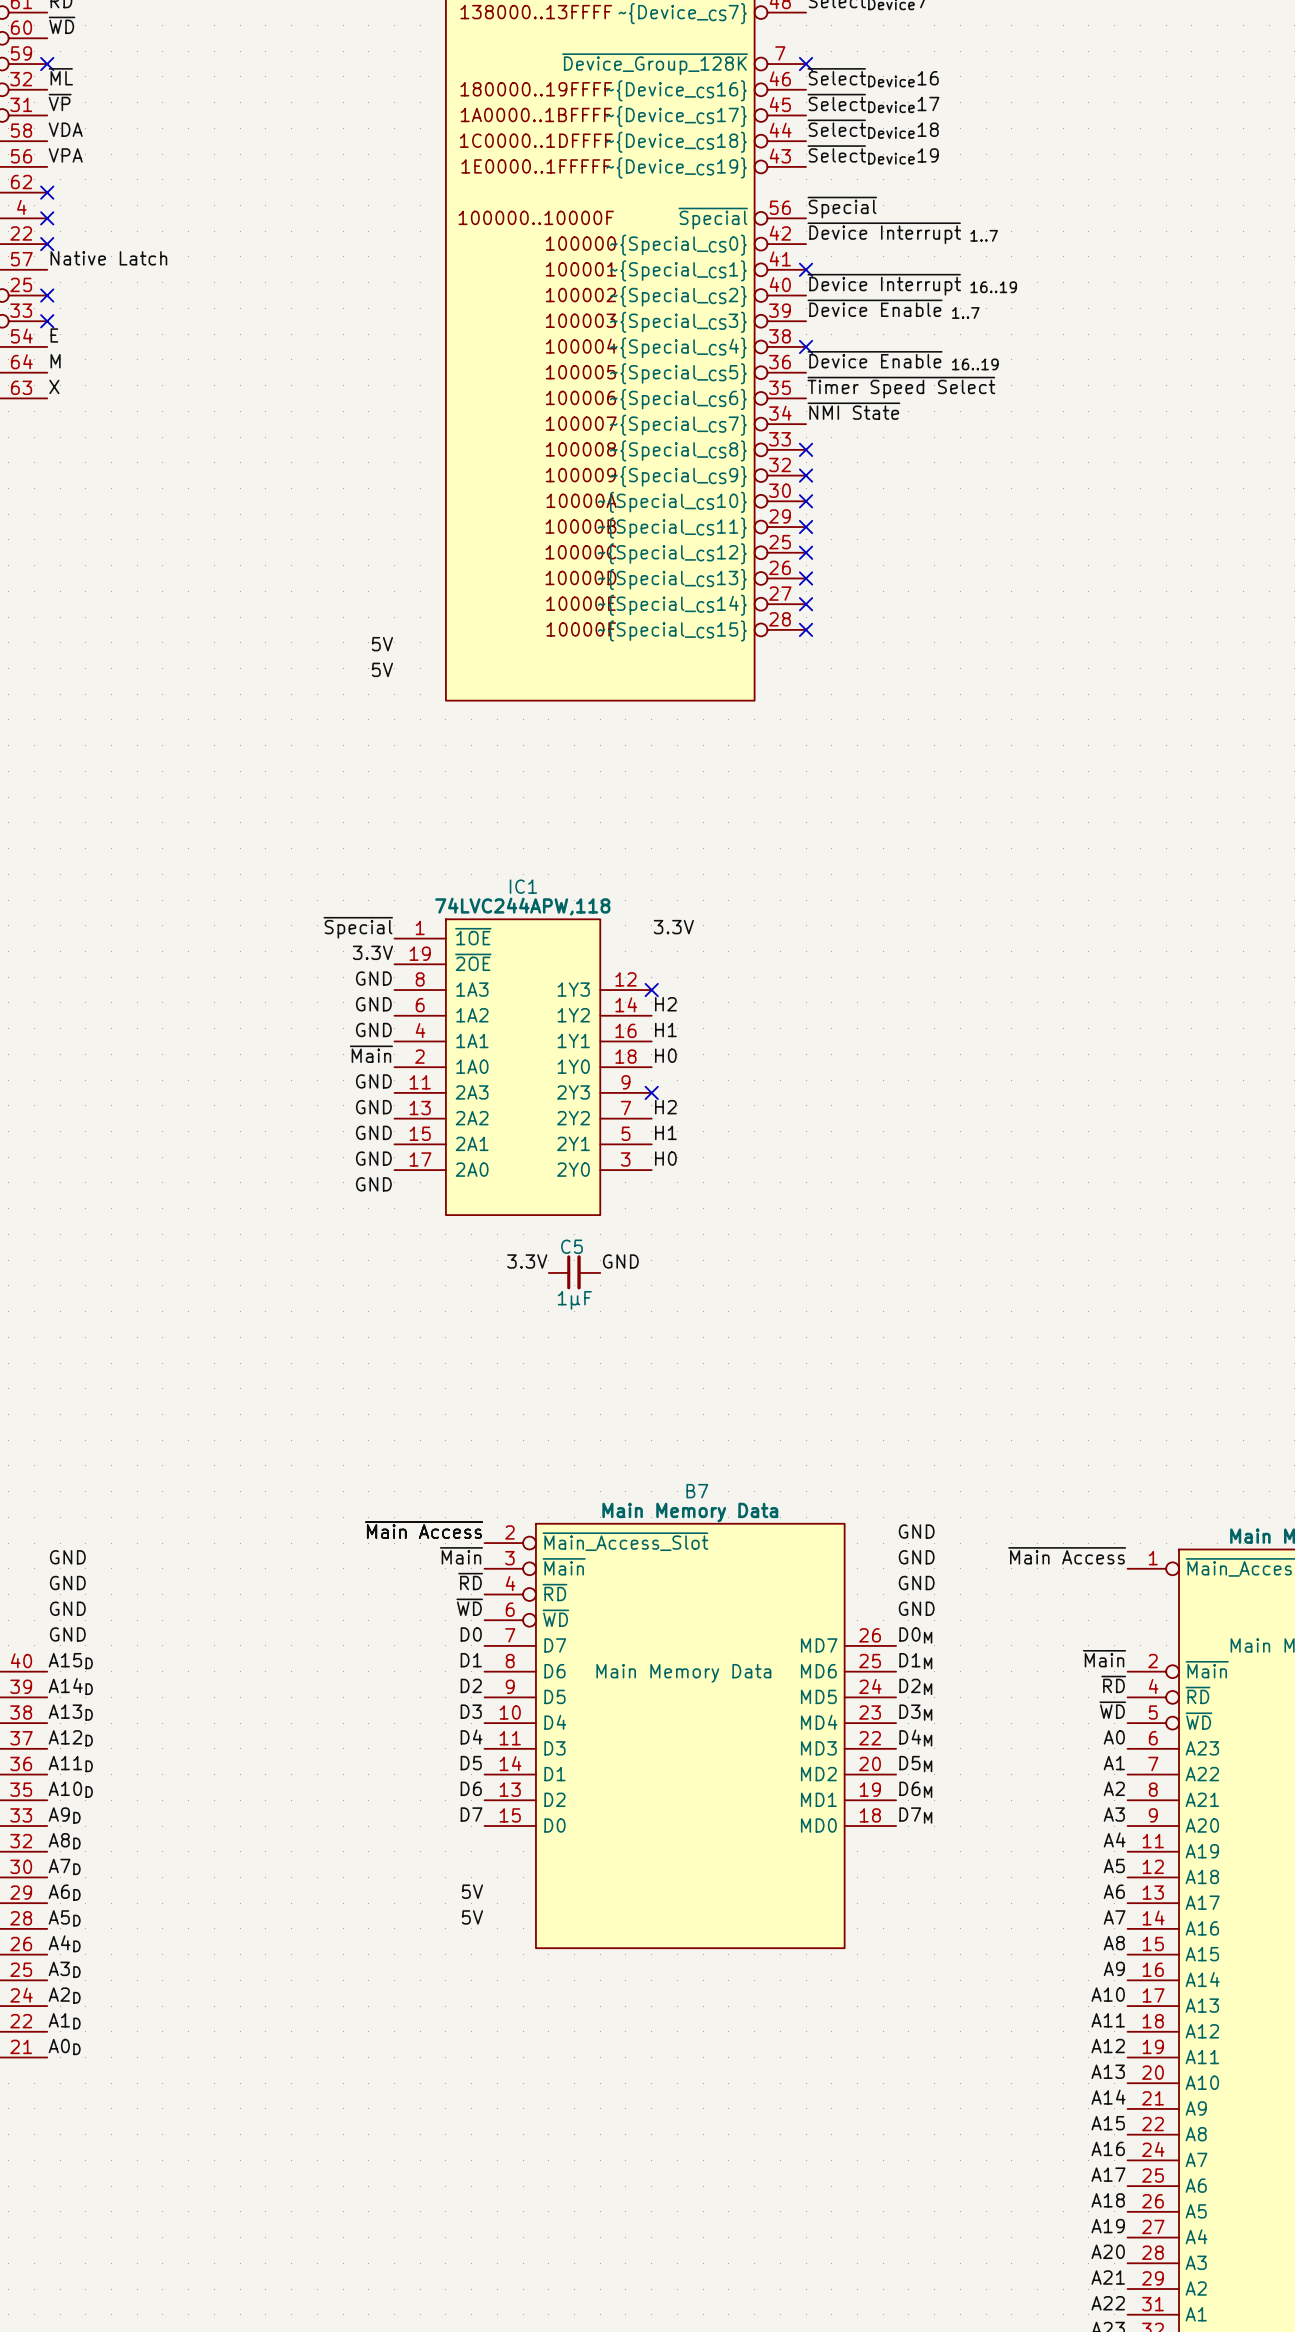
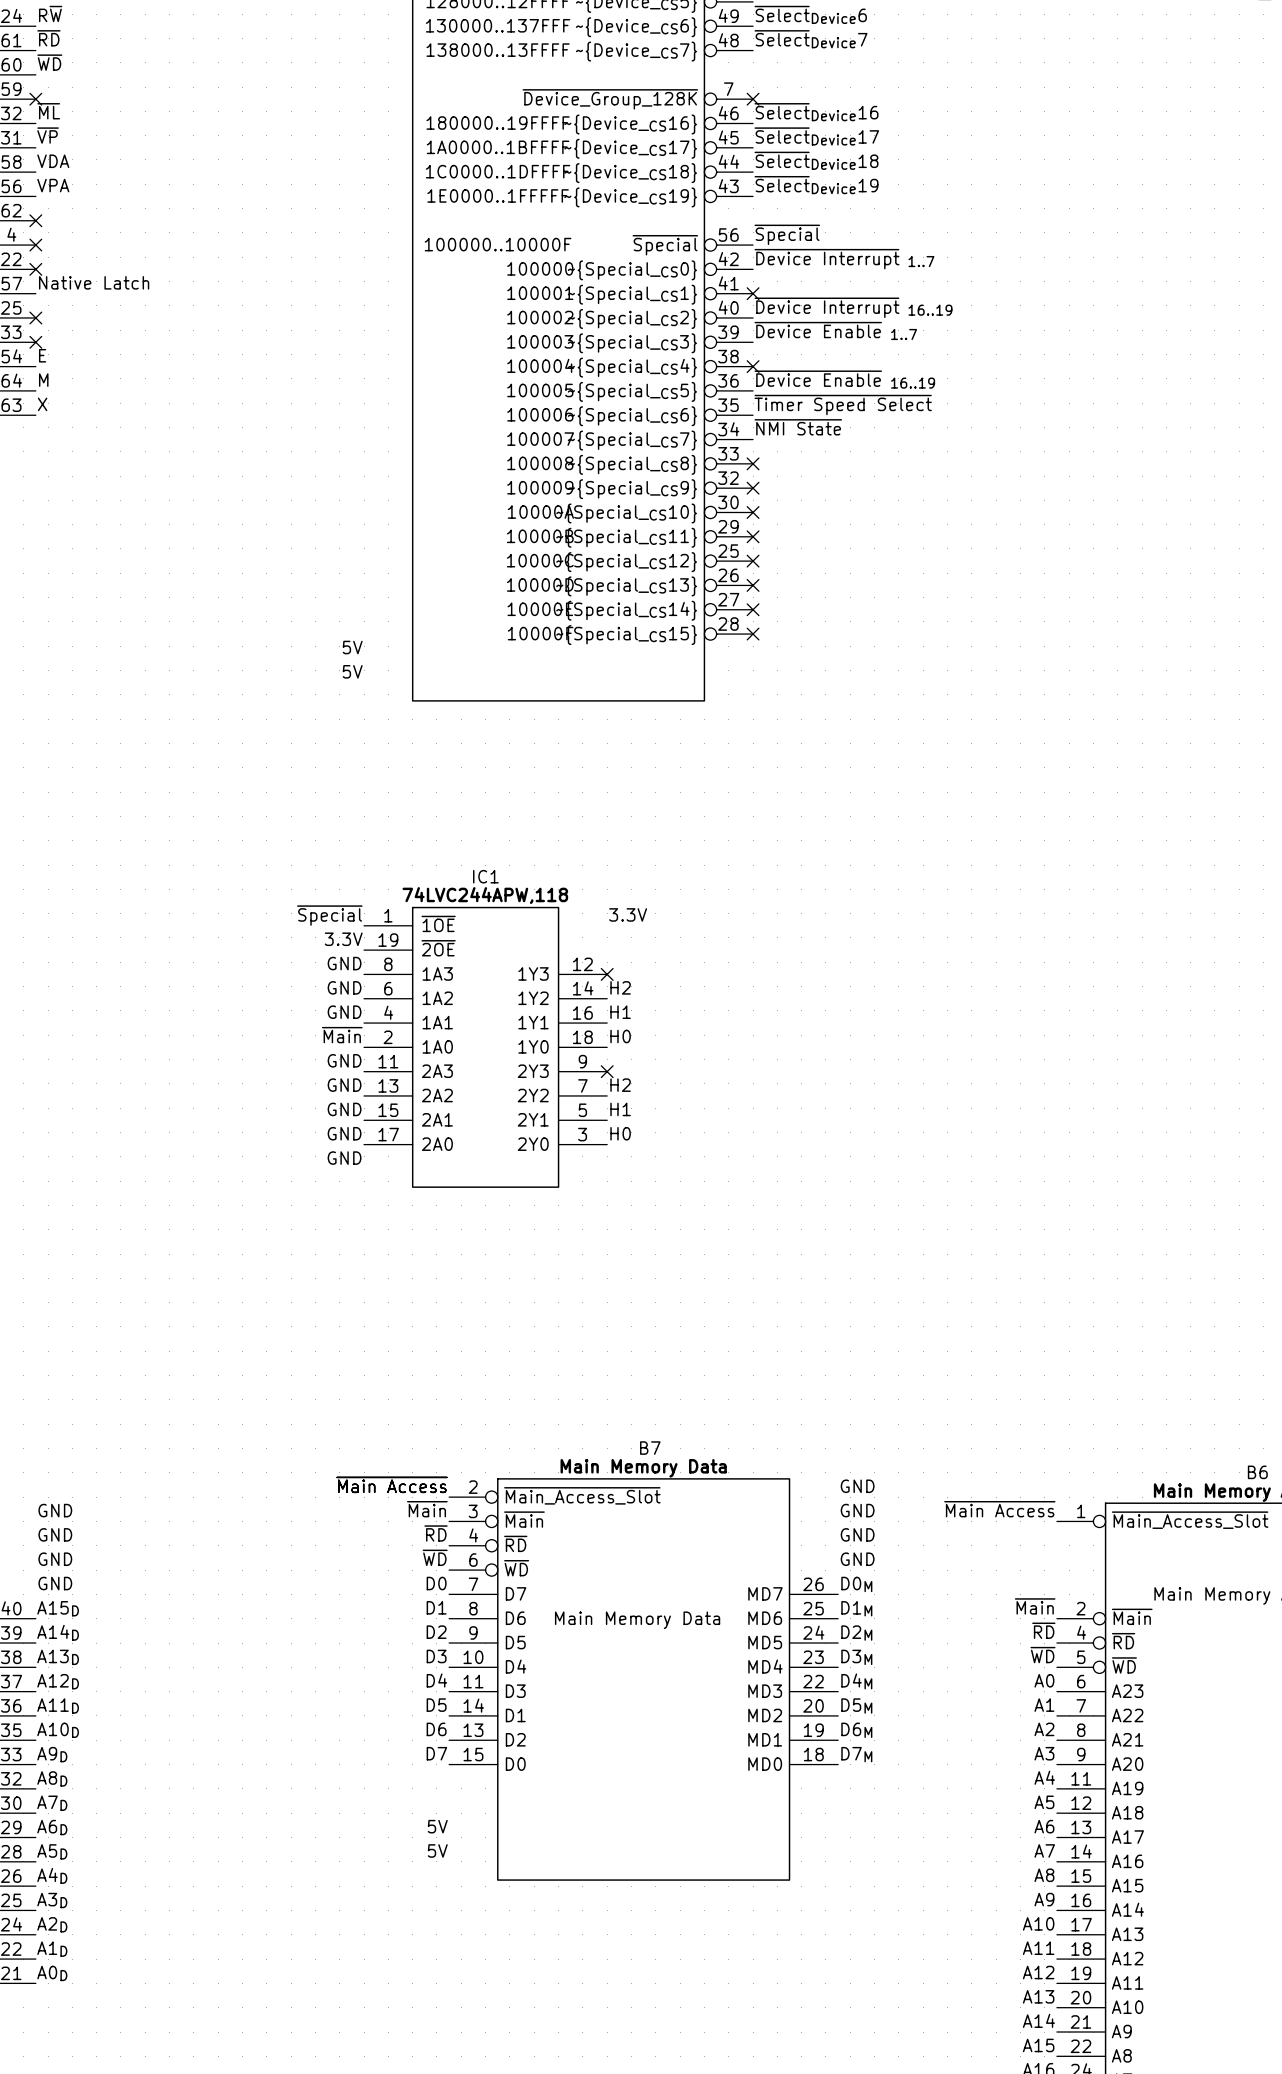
label: 3.3V (527, 1261) -> none
label: GND (620, 1261) -> none
C5: 1μF (574, 1272) -> none

